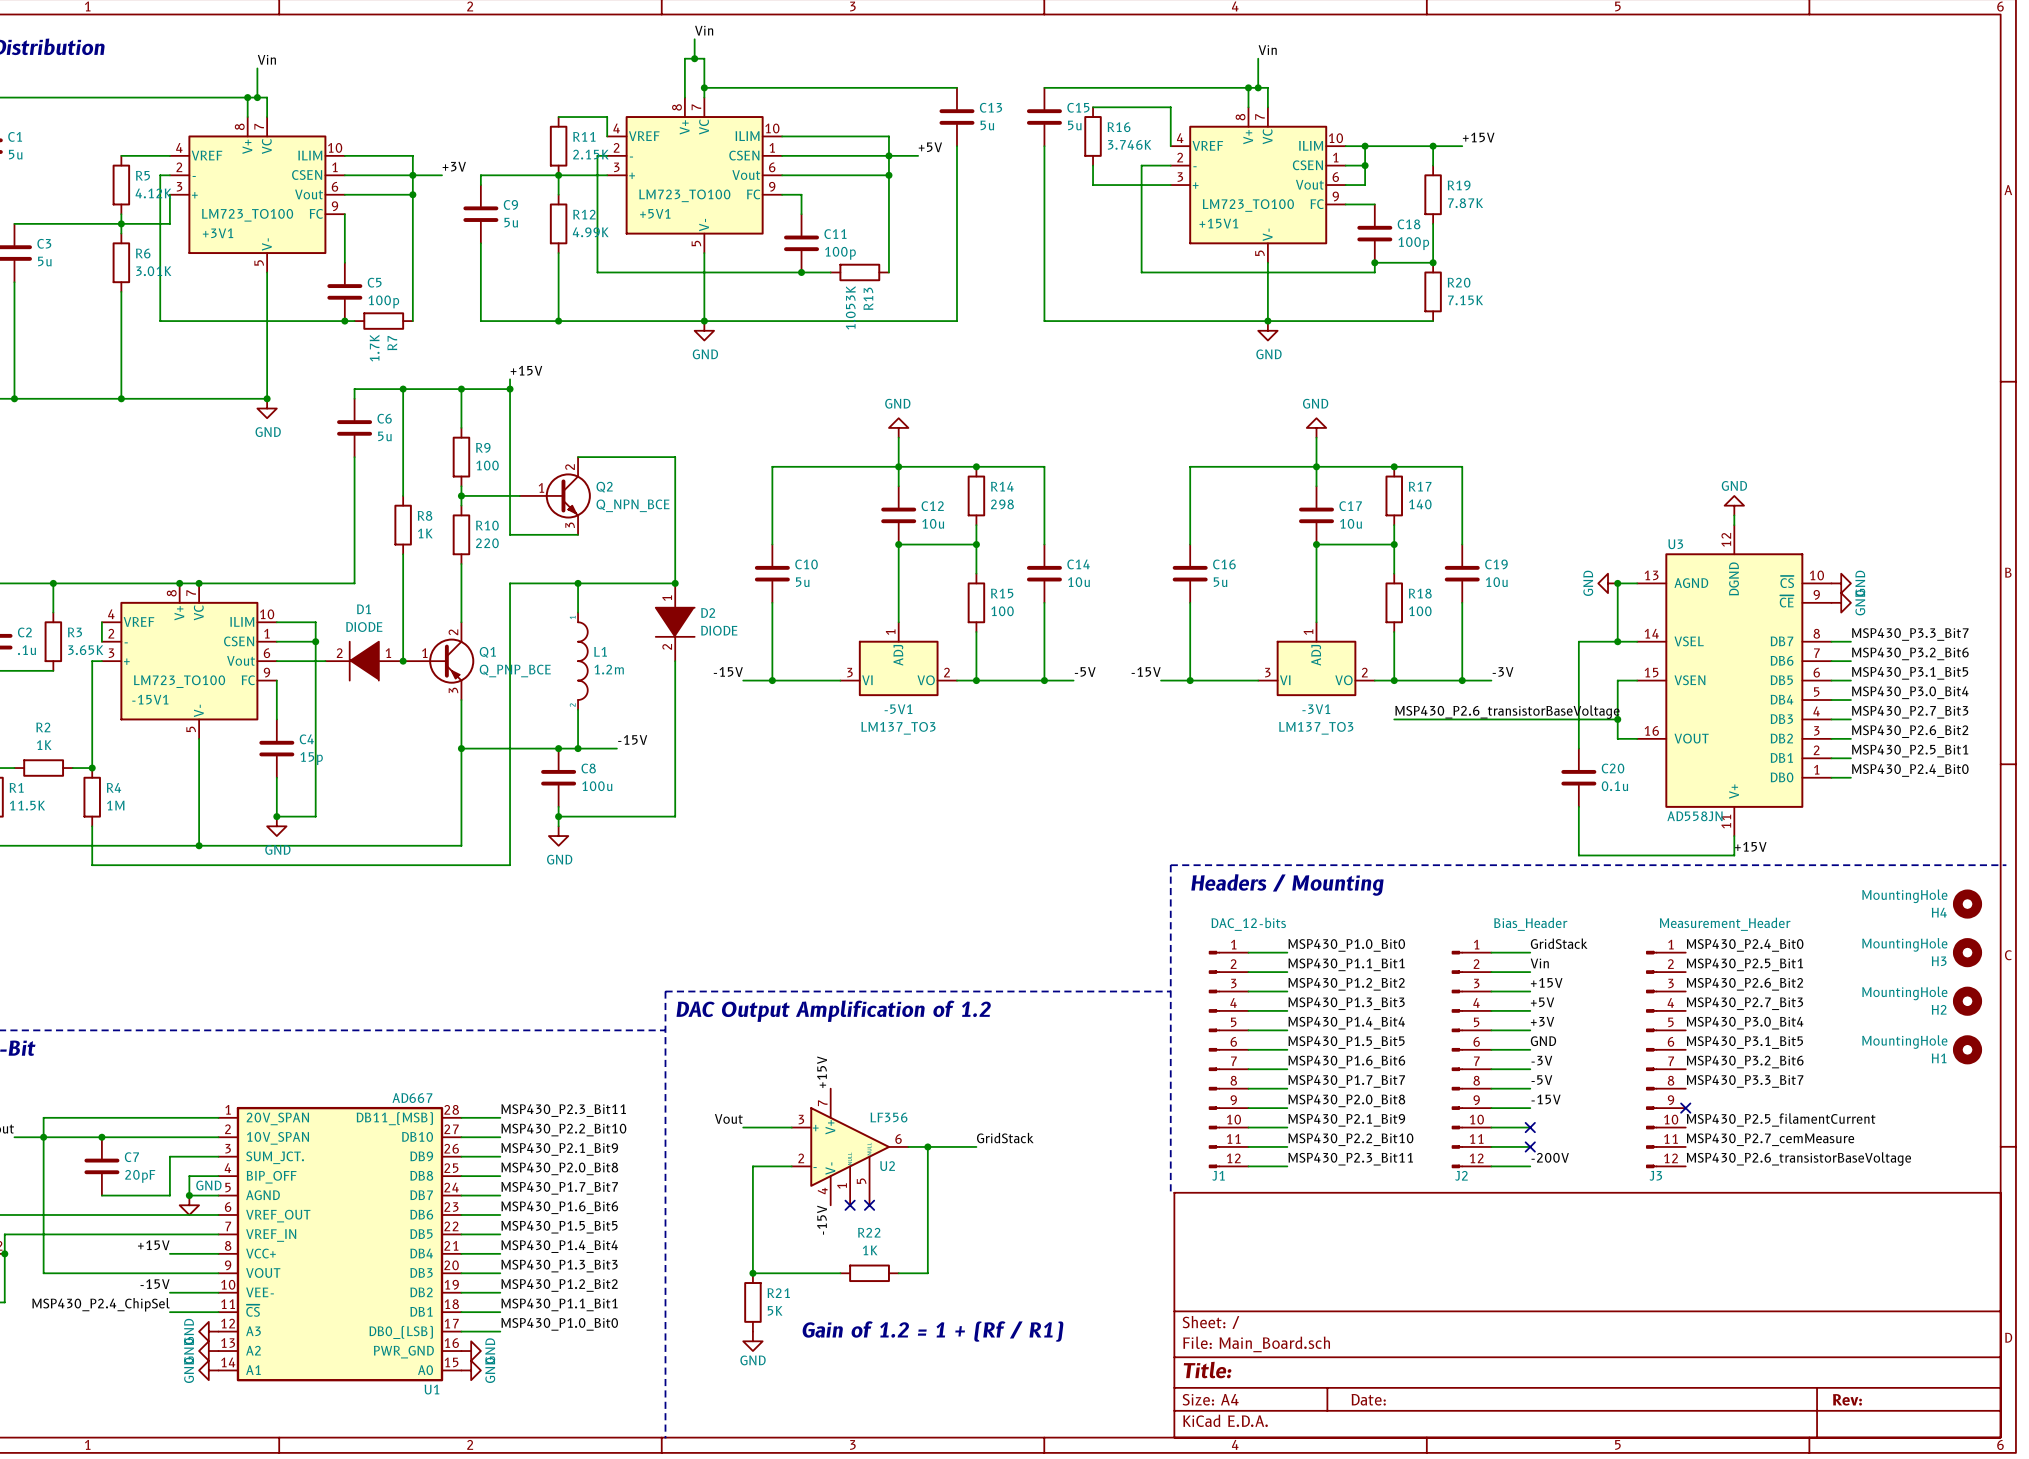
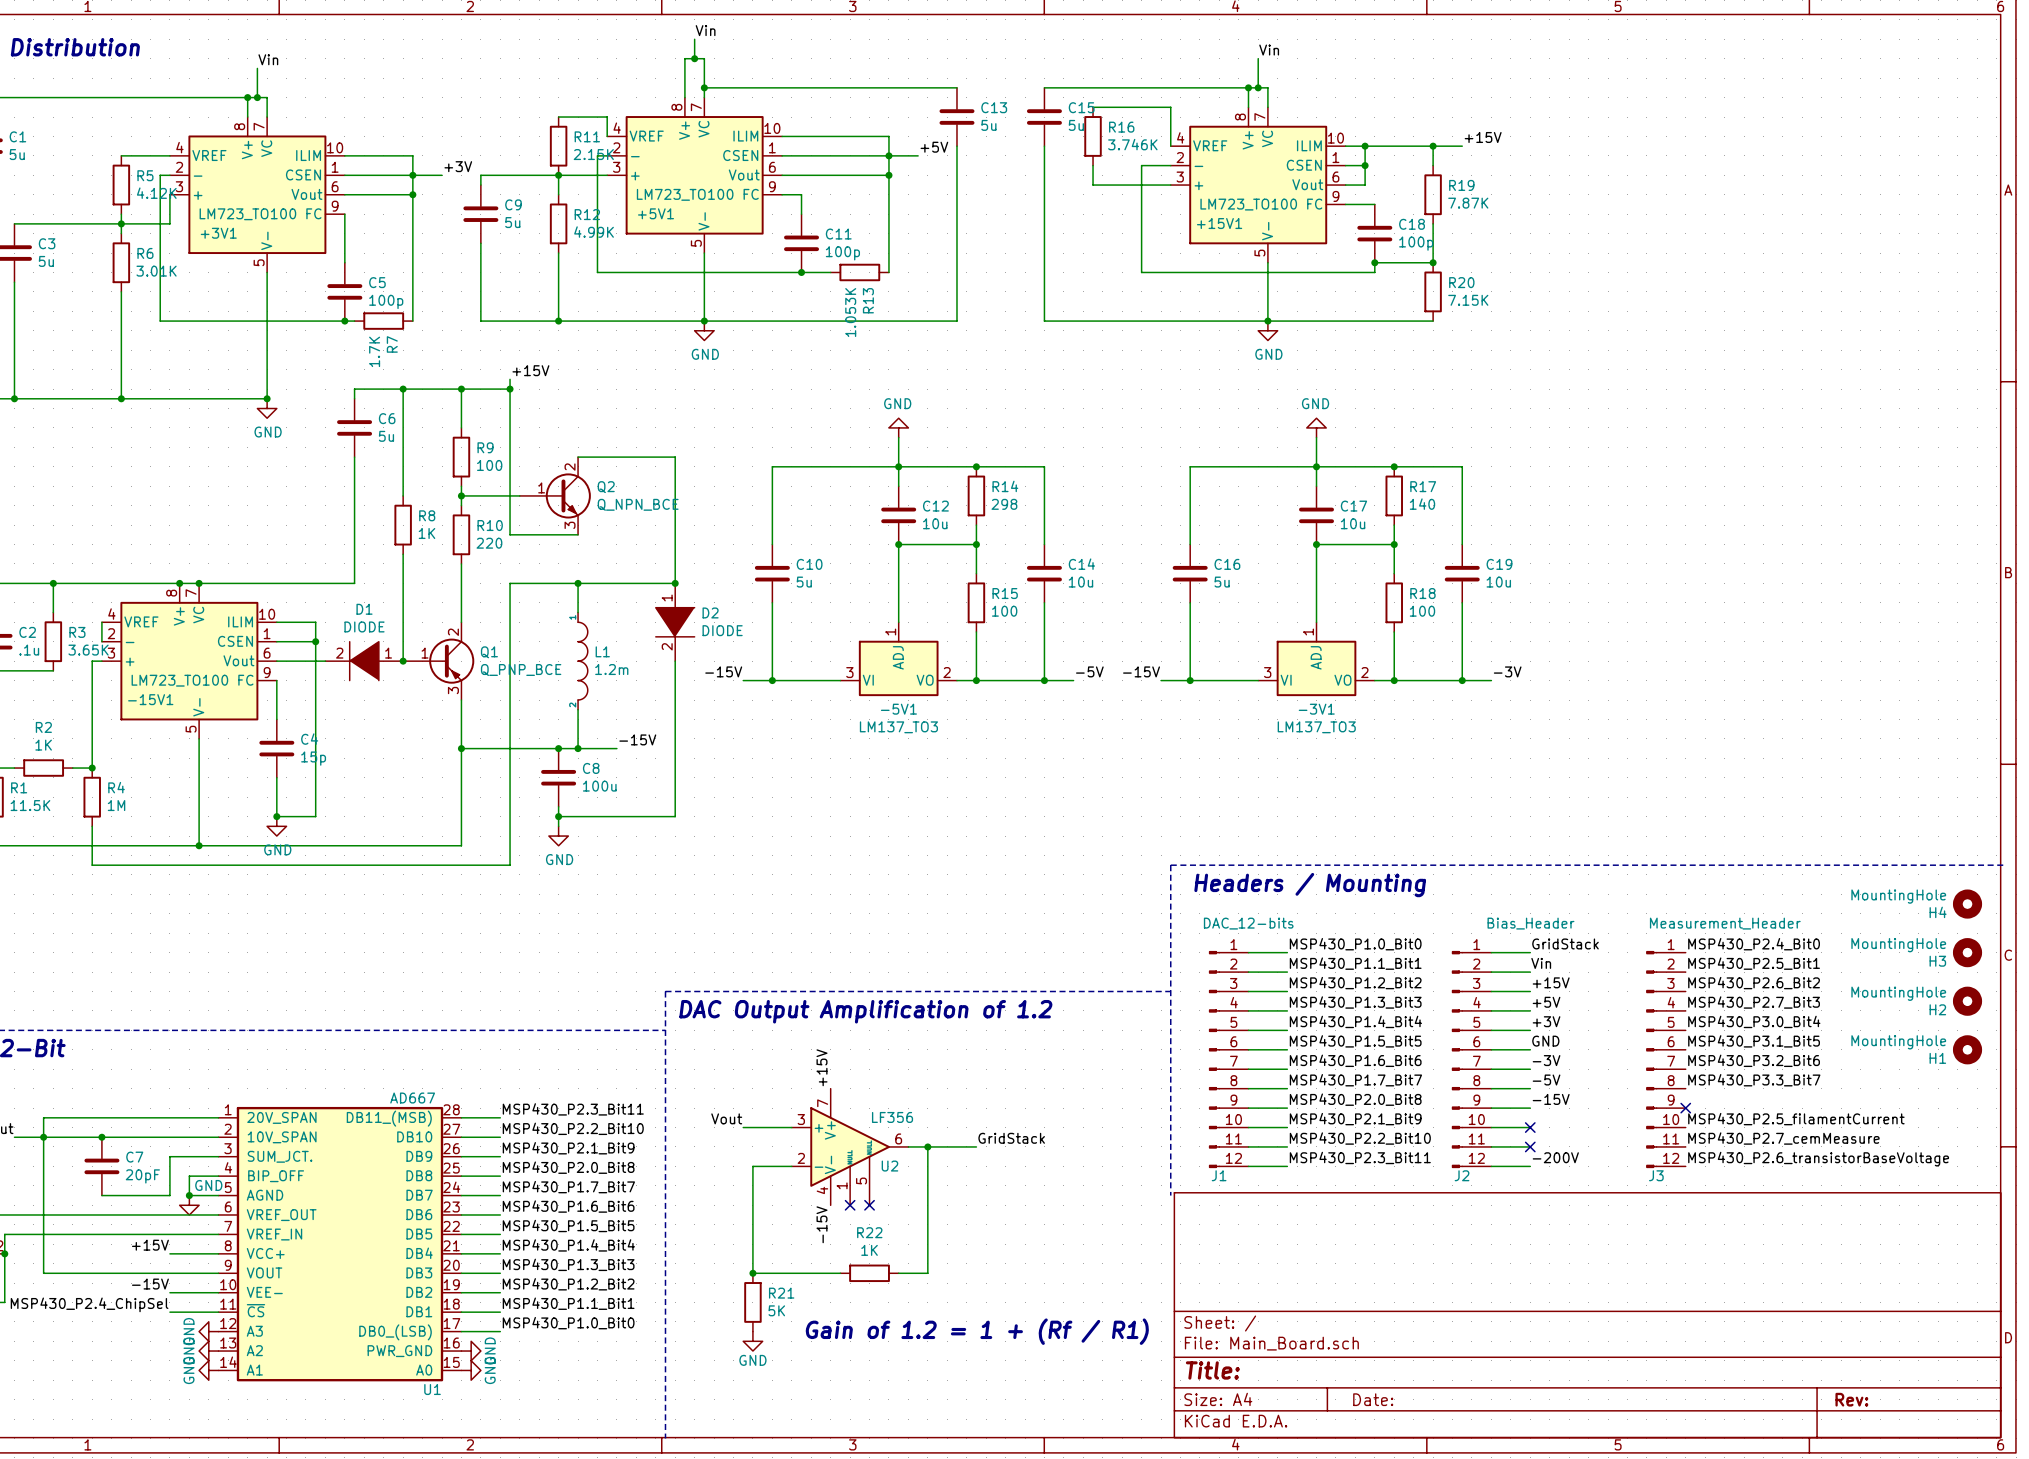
power symbol: GND (1734, 505) -> none
wire: (1734, 515) (1734, 525) -> none
power symbol: GND (1608, 583) -> none
junction: (1617, 583) -> none
wire: (1637, 583) (1617, 583) (1617, 641) -> none
power symbol: GND (1841, 583) -> none
power symbol: GND (1841, 602) -> none
label: MSP430_P3.3_Bit7 (1910, 634) -> none
junction: (1617, 641) -> none
wire: (1637, 641) (1578, 641) (1578, 748) -> none
wire: (1831, 641) (1850, 641) -> none
label: MSP430_P3.2_Bit6 (1910, 653) -> none
wire: (1831, 661) (1850, 661) -> none
label: MSP430_P3.1_Bit5 (1910, 673) -> none
wire: (1637, 680) (1617, 680) (1617, 738) (1637, 738) -> none
U3: AD558JN (1734, 680) -> none
wire: (1831, 680) (1850, 680) -> none
label: MSP430_P3.0_Bit4 (1910, 692) -> none
wire: (1831, 700) (1850, 700) -> none
label: MSP430_P2.6_transistorBaseVoltage (1507, 712) -> none
label: MSP430_P2.7_Bit3 (1910, 712) -> none
wire: (1394, 719) (1617, 719) -> none
junction: (1617, 719) -> none
wire: (1831, 719) (1850, 719) -> none
label: MSP430_P2.6_Bit2 (1910, 731) -> none
wire: (1831, 738) (1850, 738) -> none
label: MSP430_P2.5_Bit1 (1910, 751) -> none
wire: (1831, 758) (1850, 758) -> none
label: MSP430_P2.4_Bit0 (1910, 770) -> none
C20: 0.1u (1578, 777) -> none
wire: (1831, 777) (1850, 777) -> none
wire: (1578, 806) (1578, 855) (1734, 855) (1734, 836) -> none
label: +15V (1750, 846) -> none

